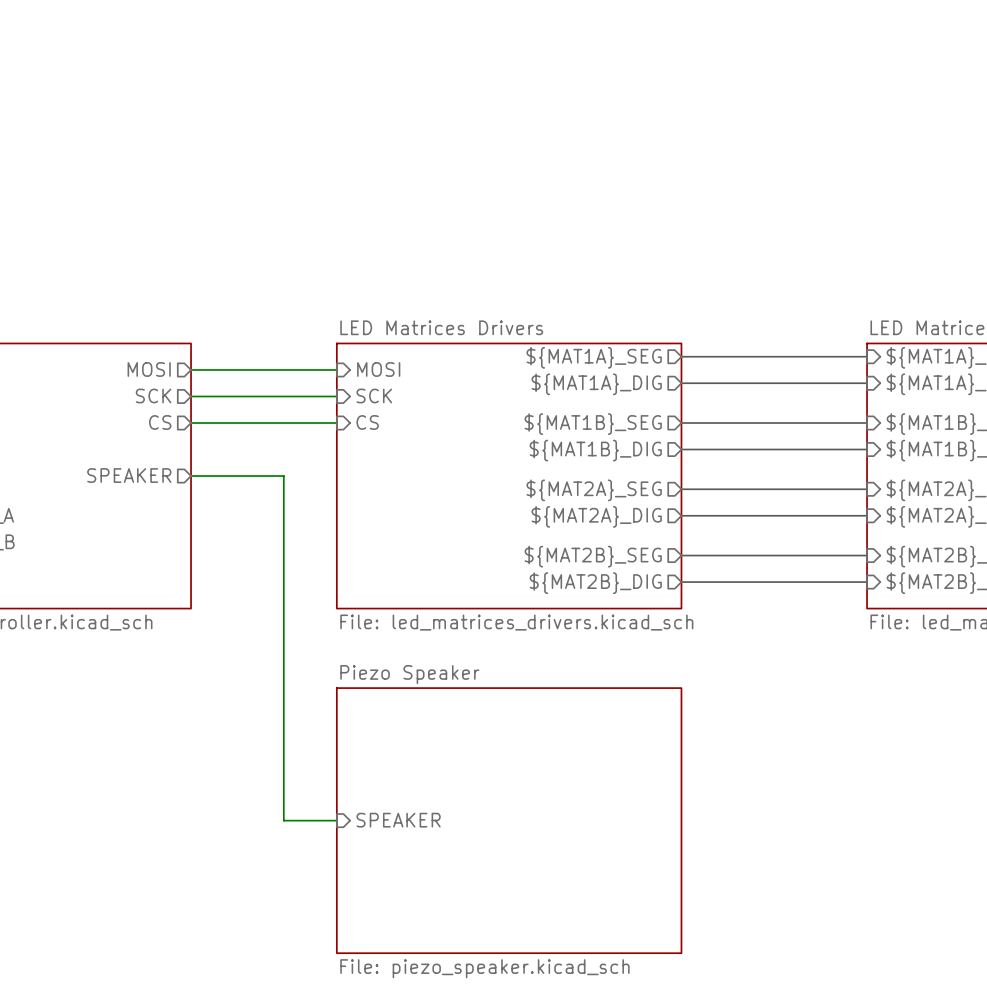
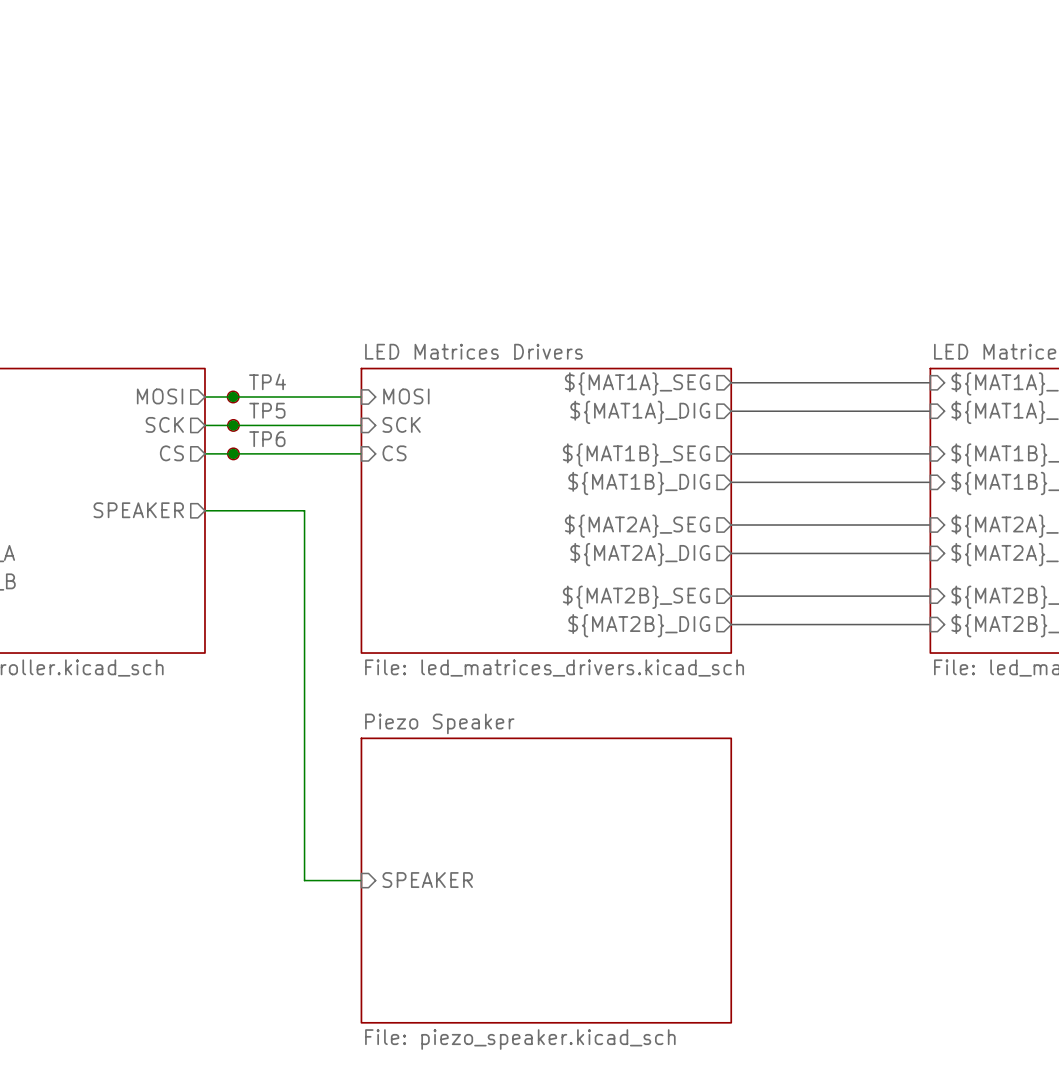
junction: none -> (233, 397)
TP4: none -> (233, 397)
junction: none -> (233, 425)
TP5: none -> (233, 425)
junction: none -> (233, 453)
TP6: none -> (233, 453)

